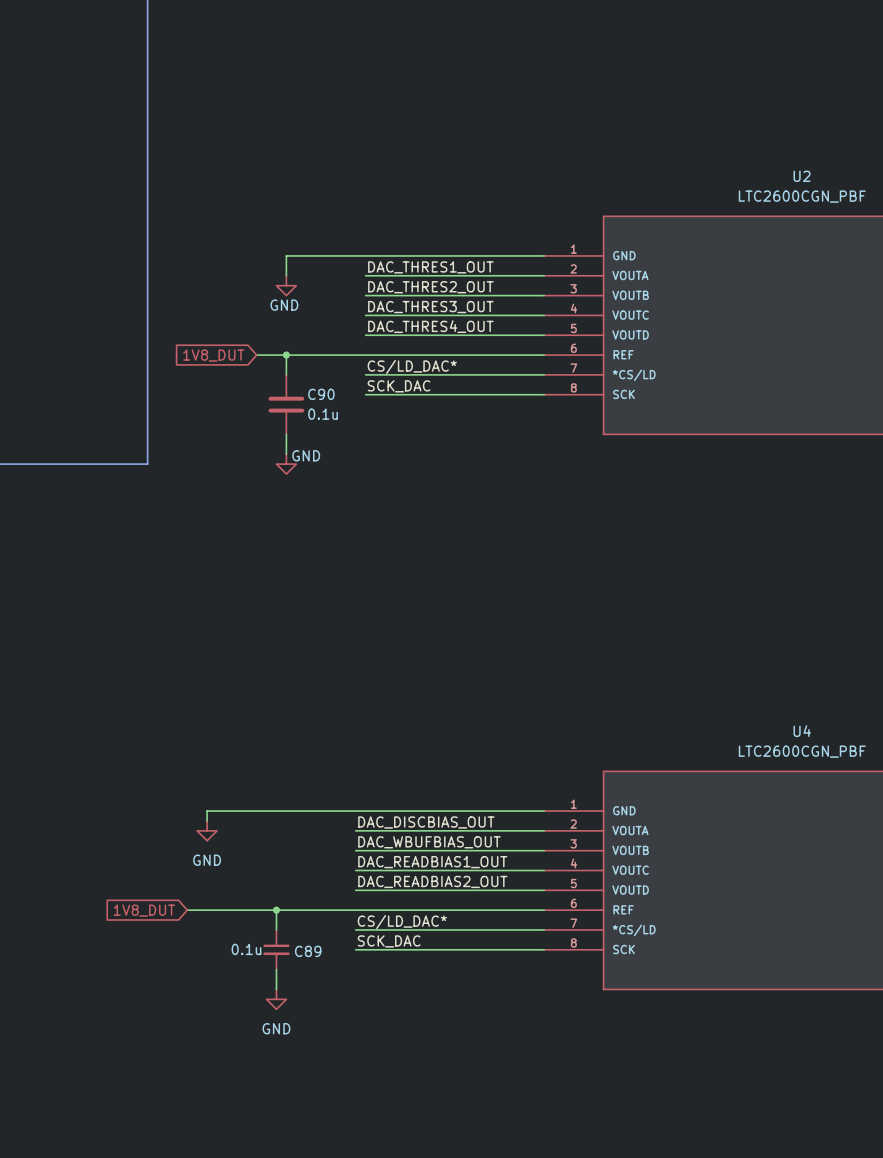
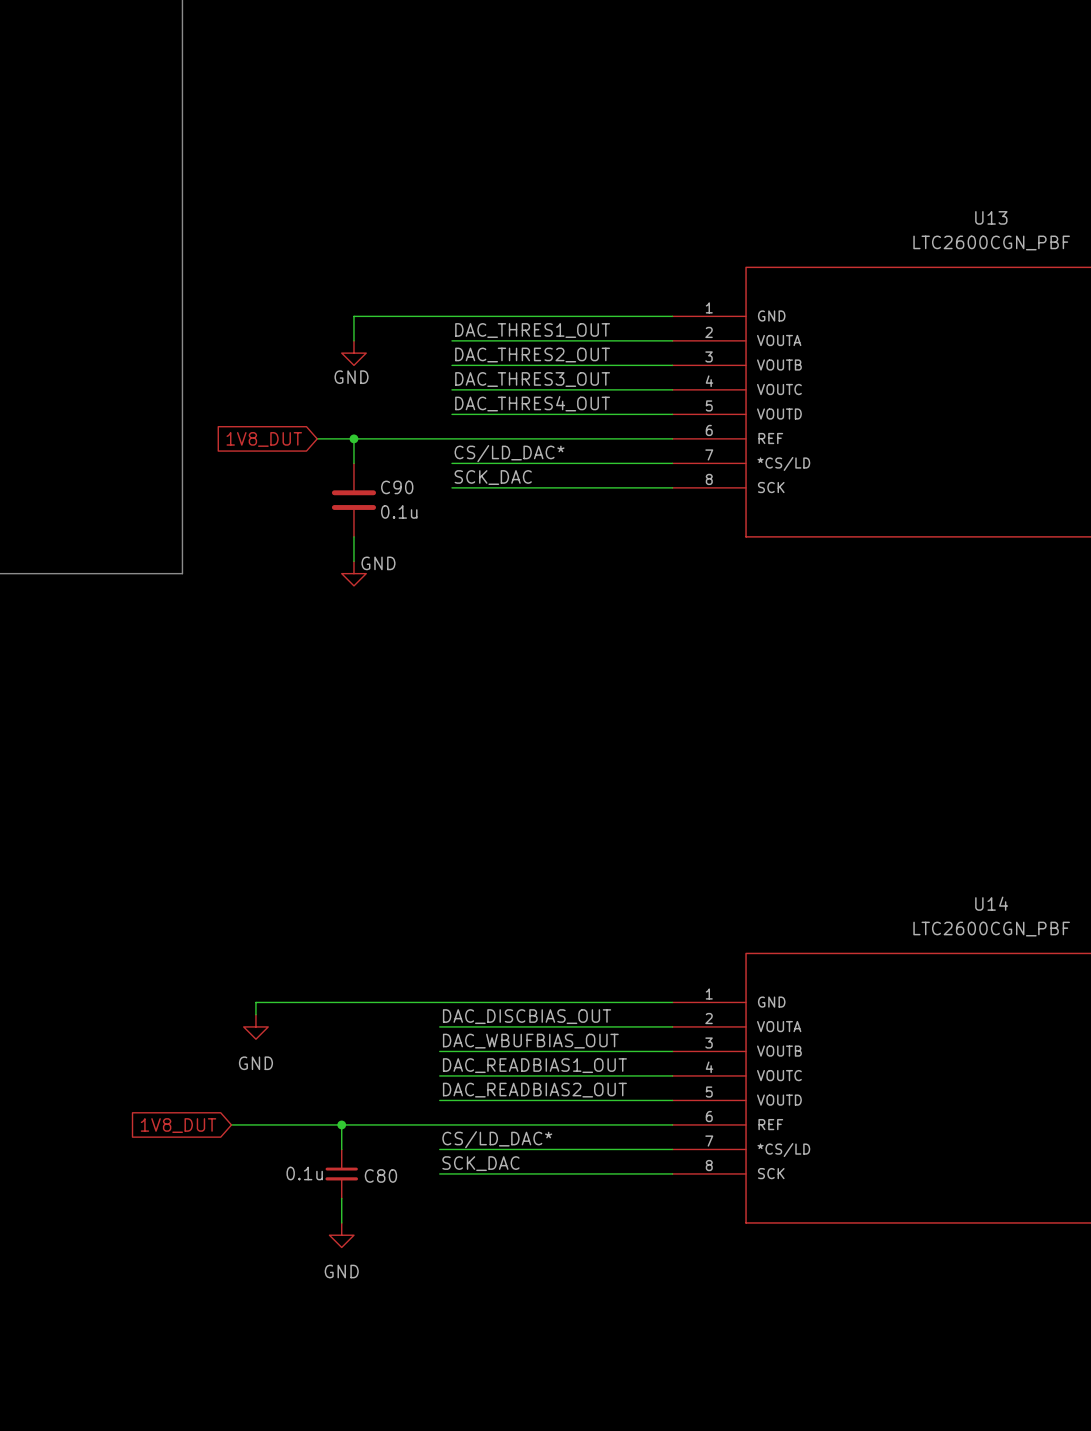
U2 name: U2 (802, 176) -> U13 (991, 217)
U4 name: U4 (802, 731) -> U14 (991, 903)
C89 name: C89 (308, 951) -> C80 (380, 1175)

